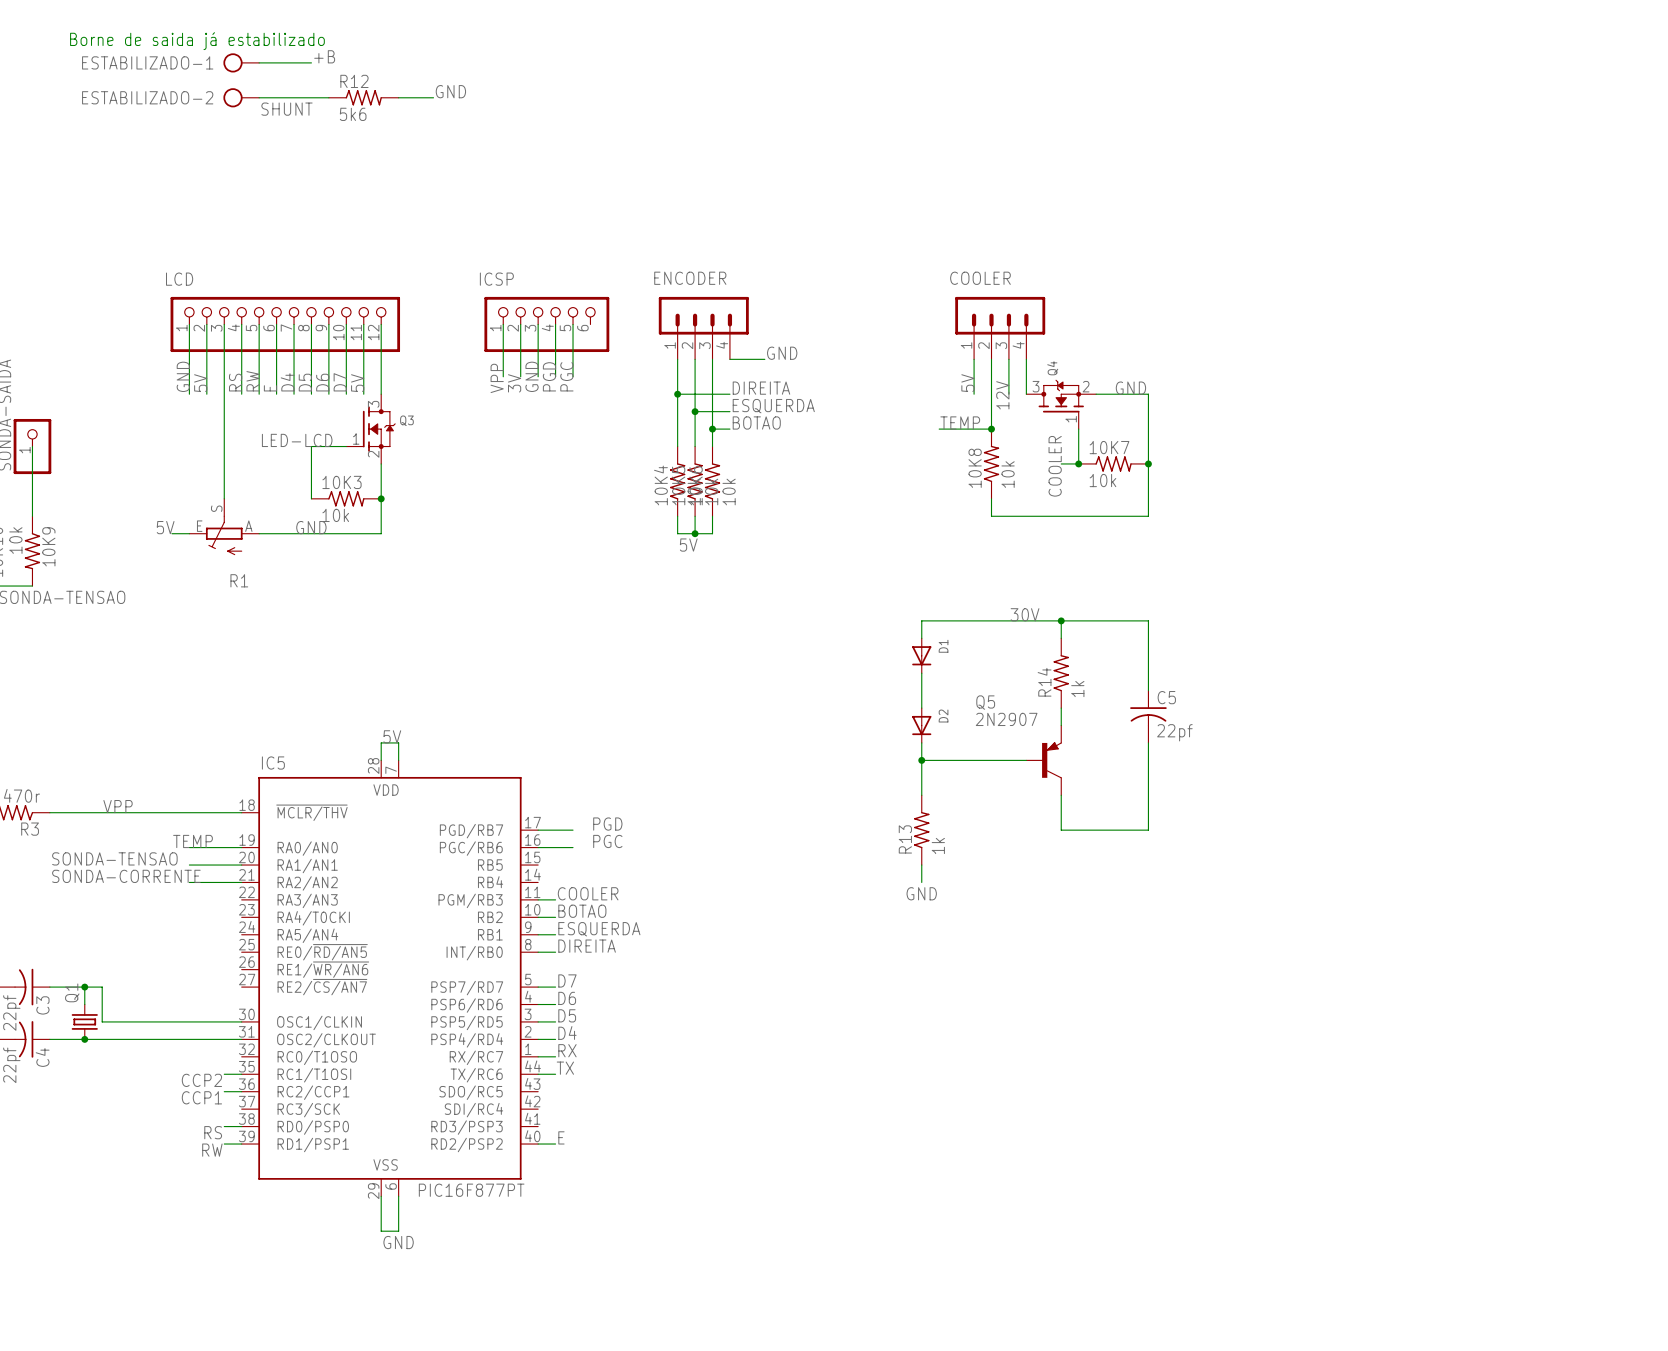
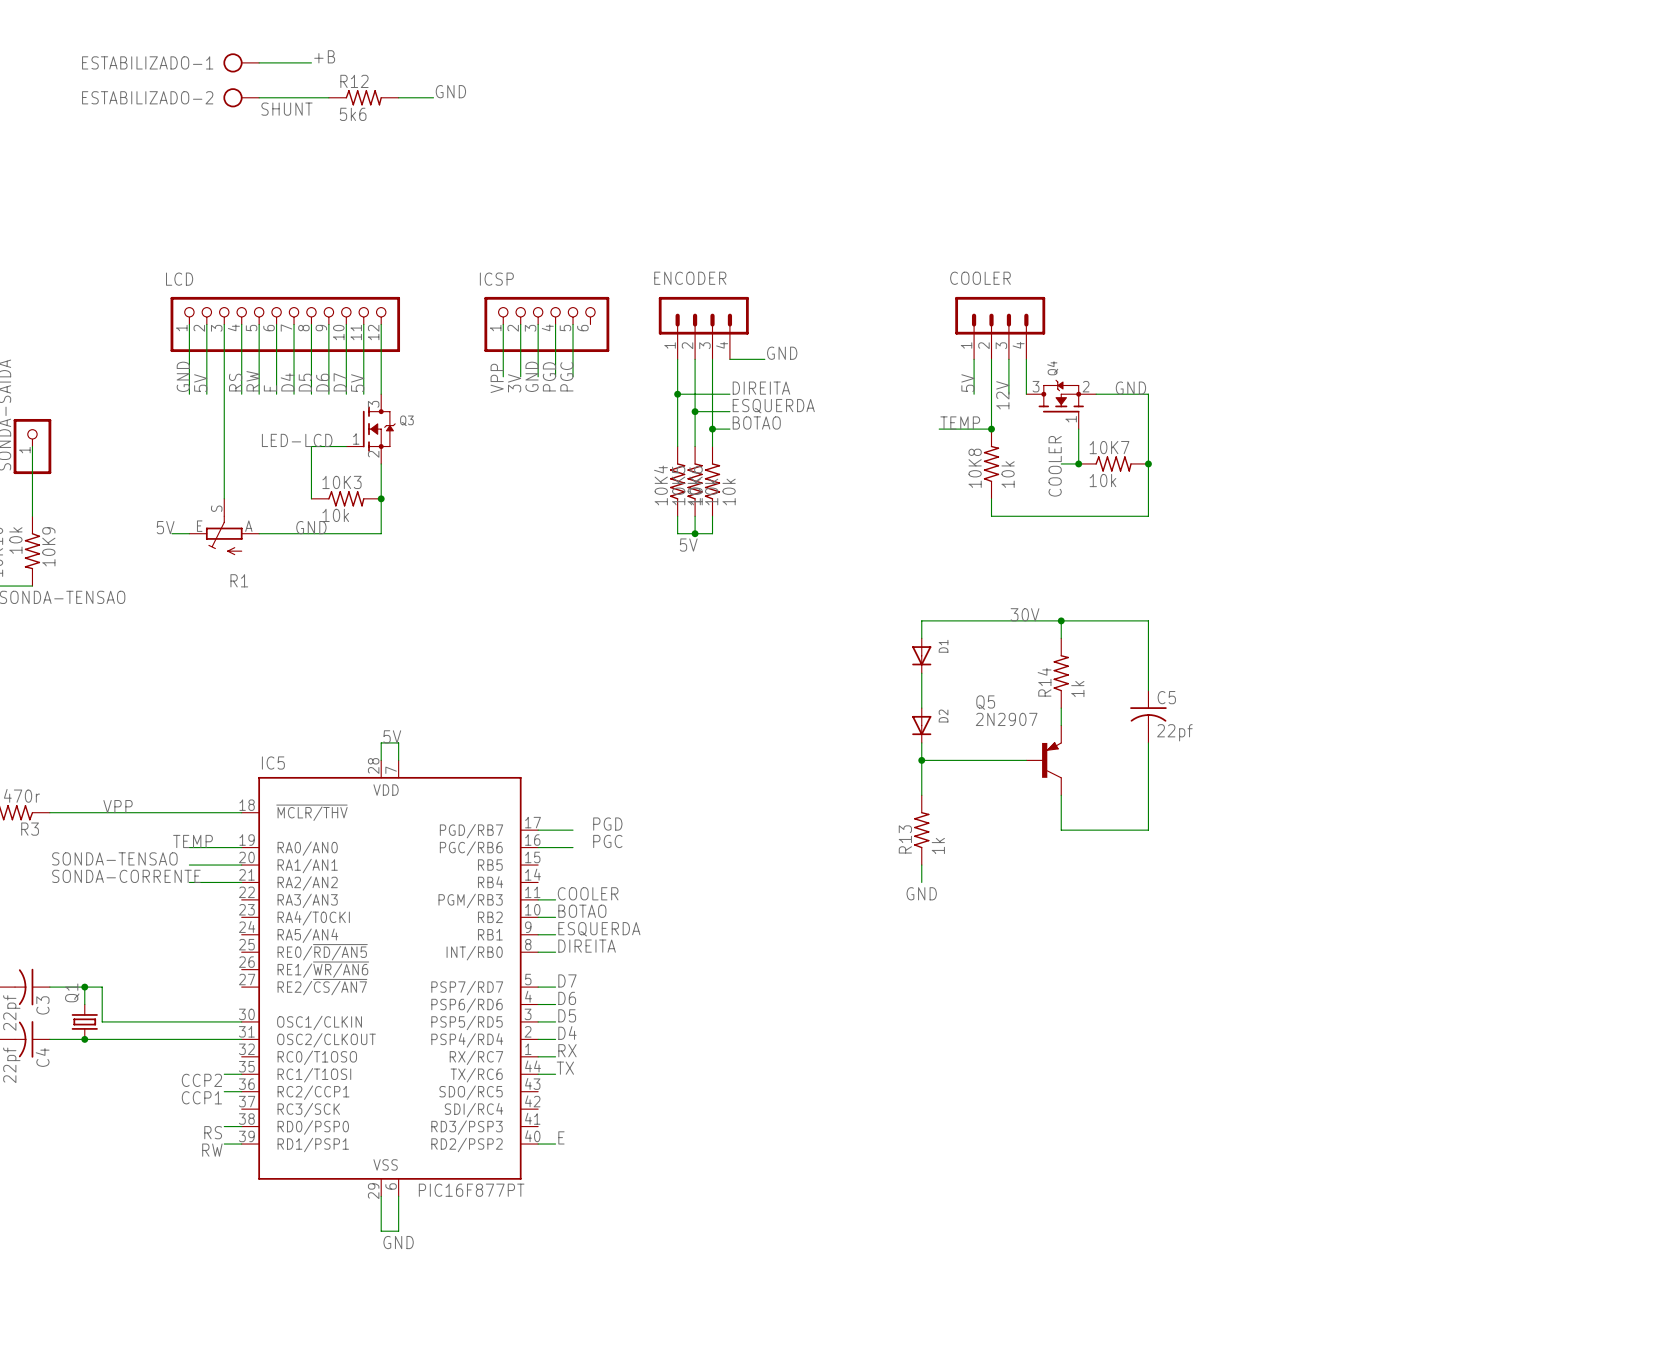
text: Borne de saida já estabilizado (197, 41) -> none

